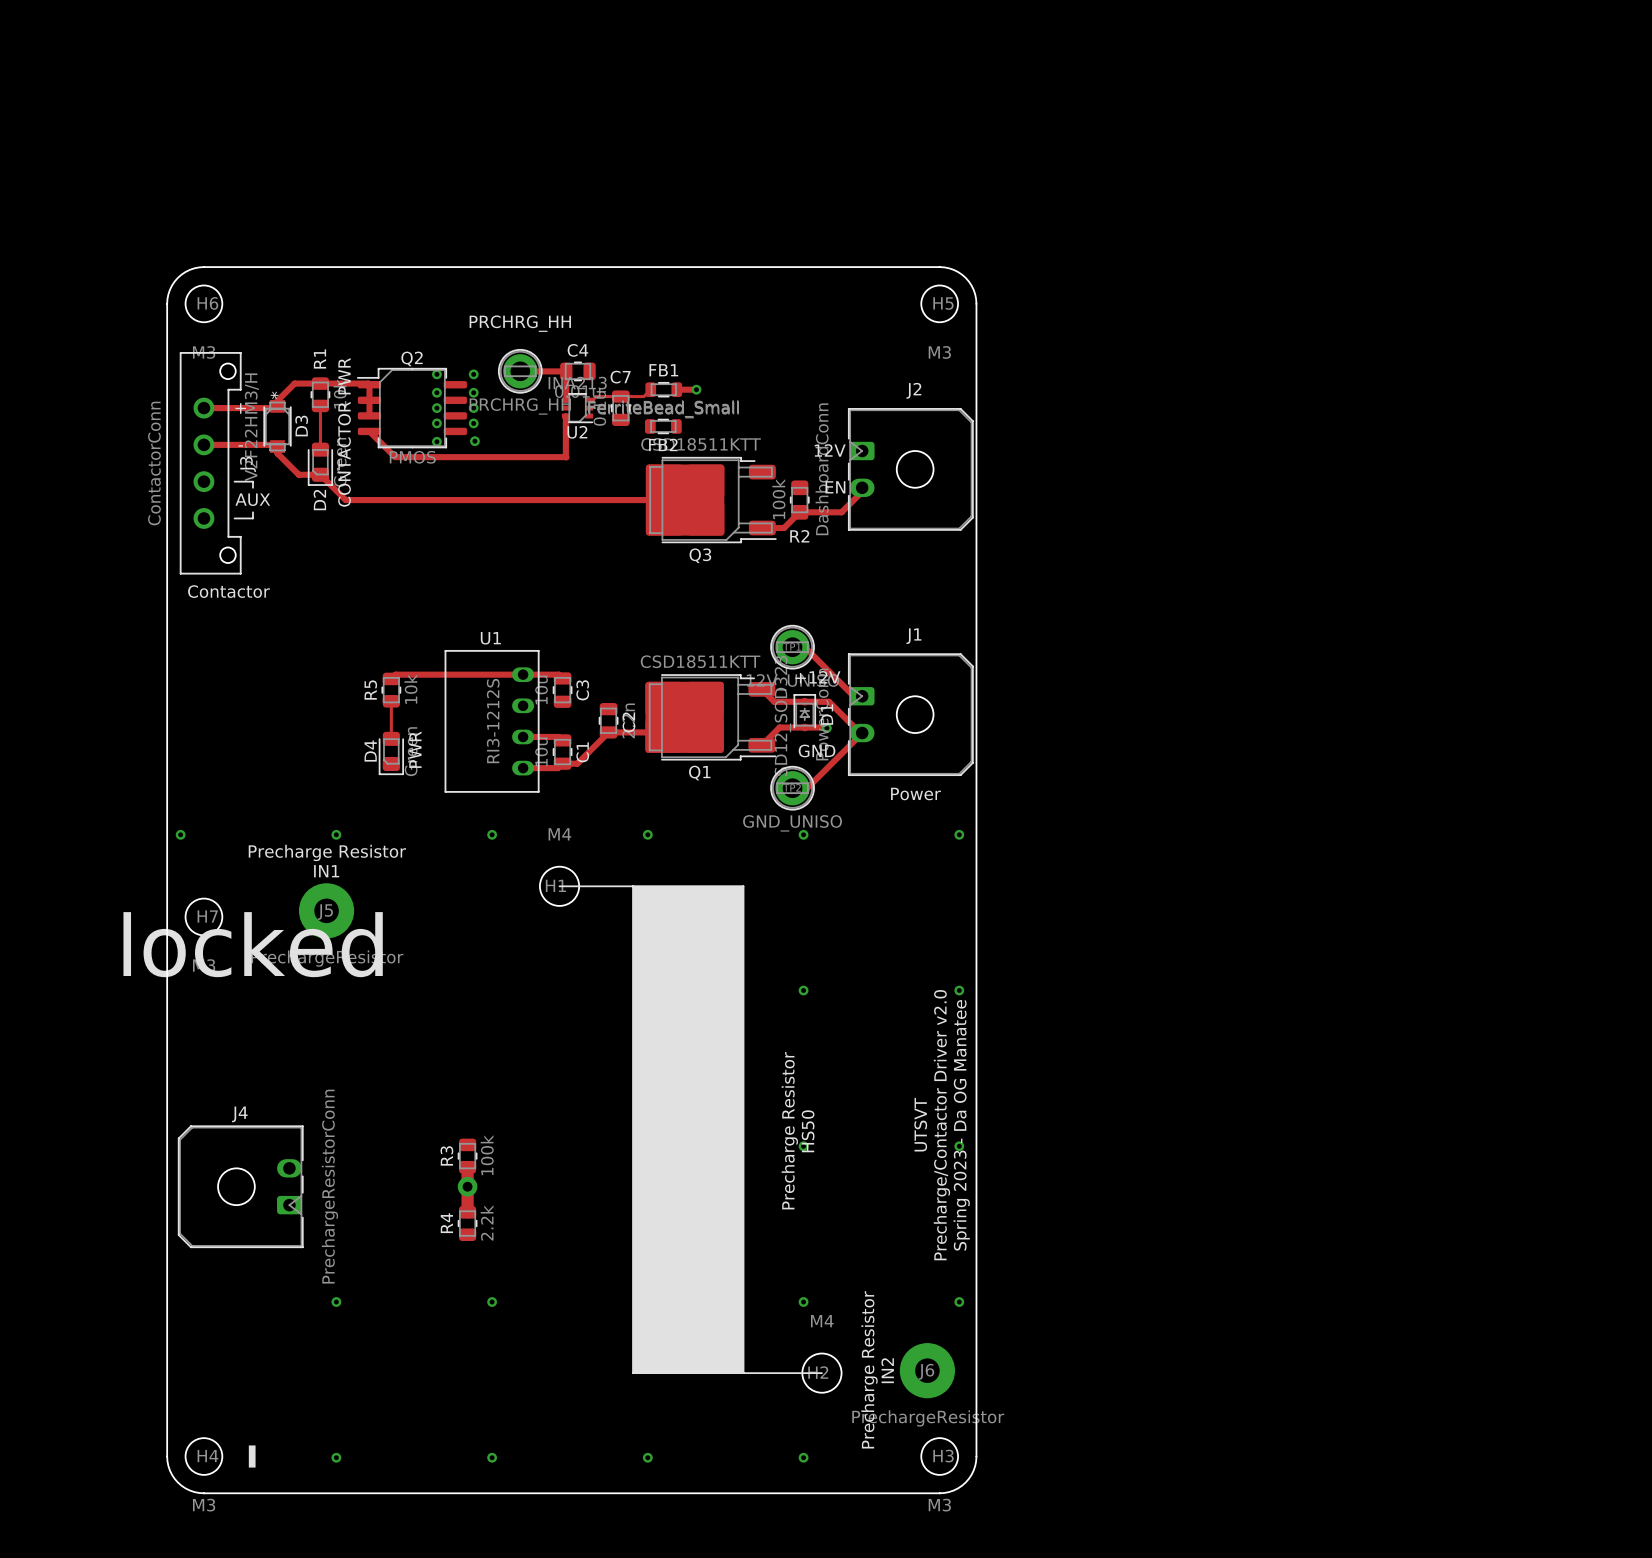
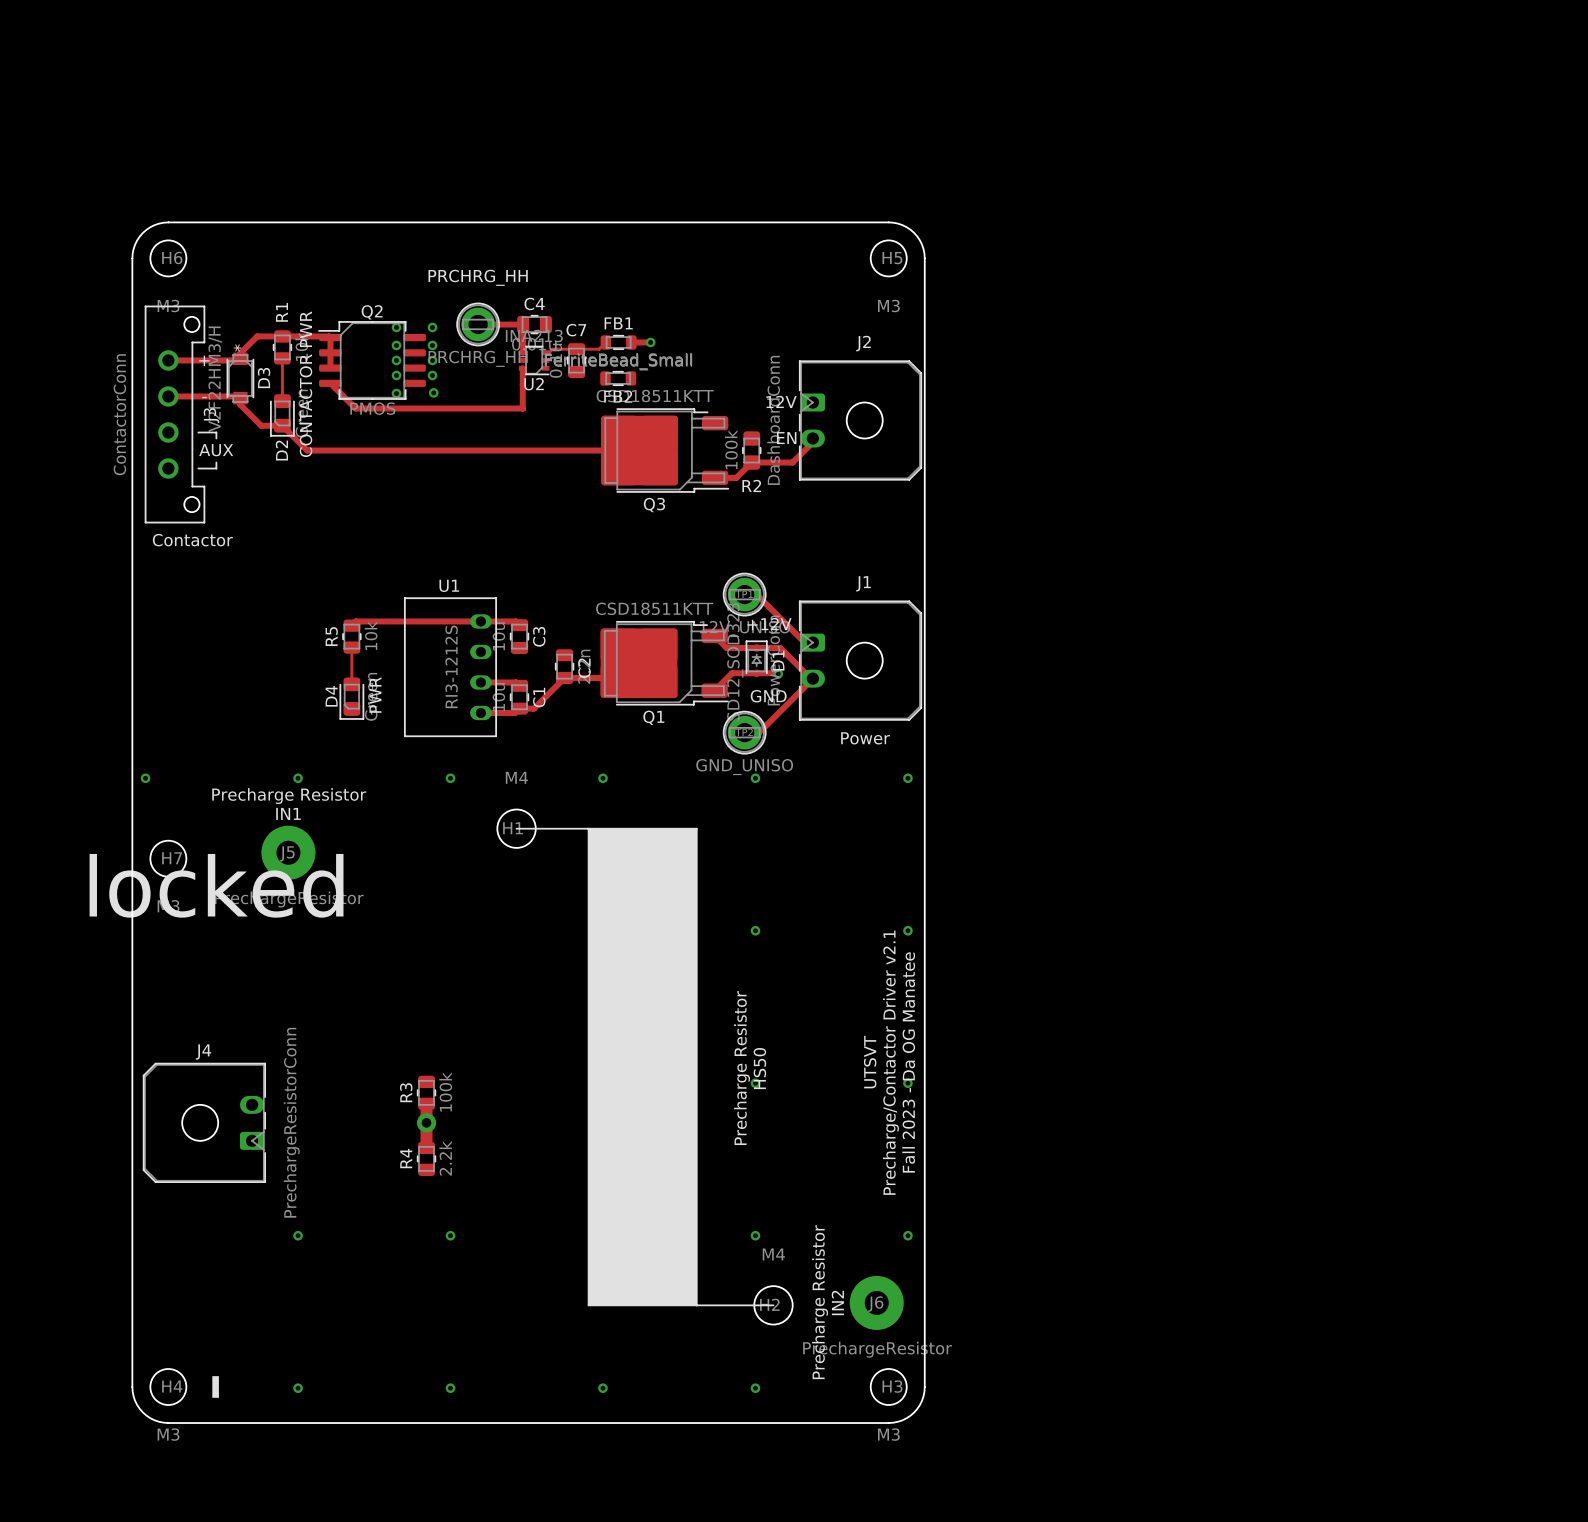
text: Precharge/Contactor Driver v2.0 (941, 1125) -> Precharge/Contactor Driver v2.1 (890, 1062)
text: Spring 2023 - Da OG Manatee (961, 1125) -> Fall 2023 - Da OG Manatee (908, 1062)

